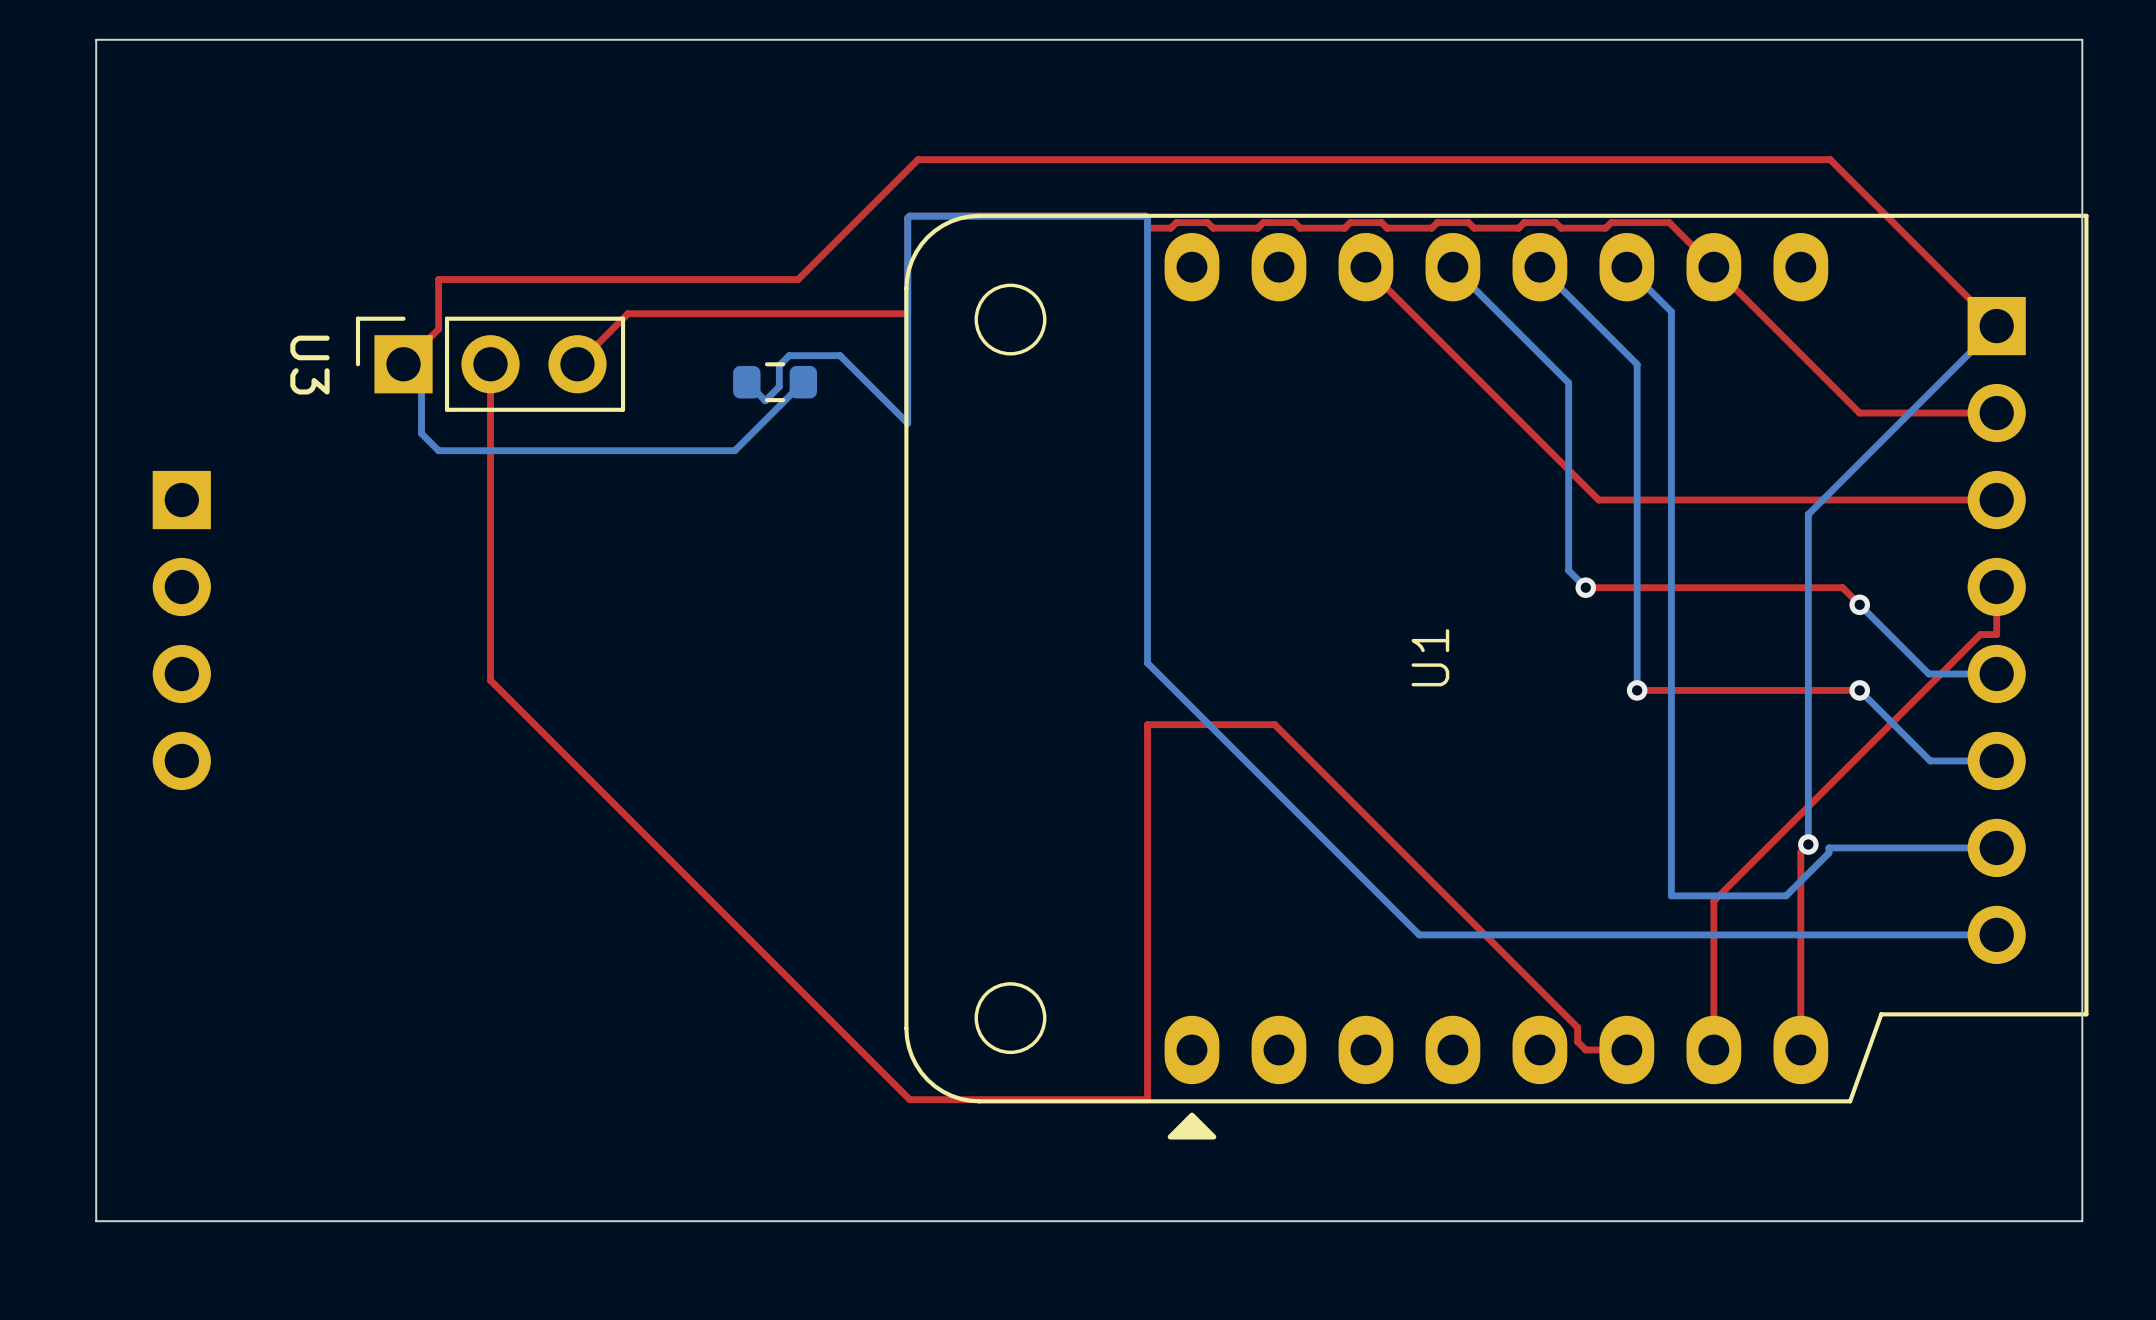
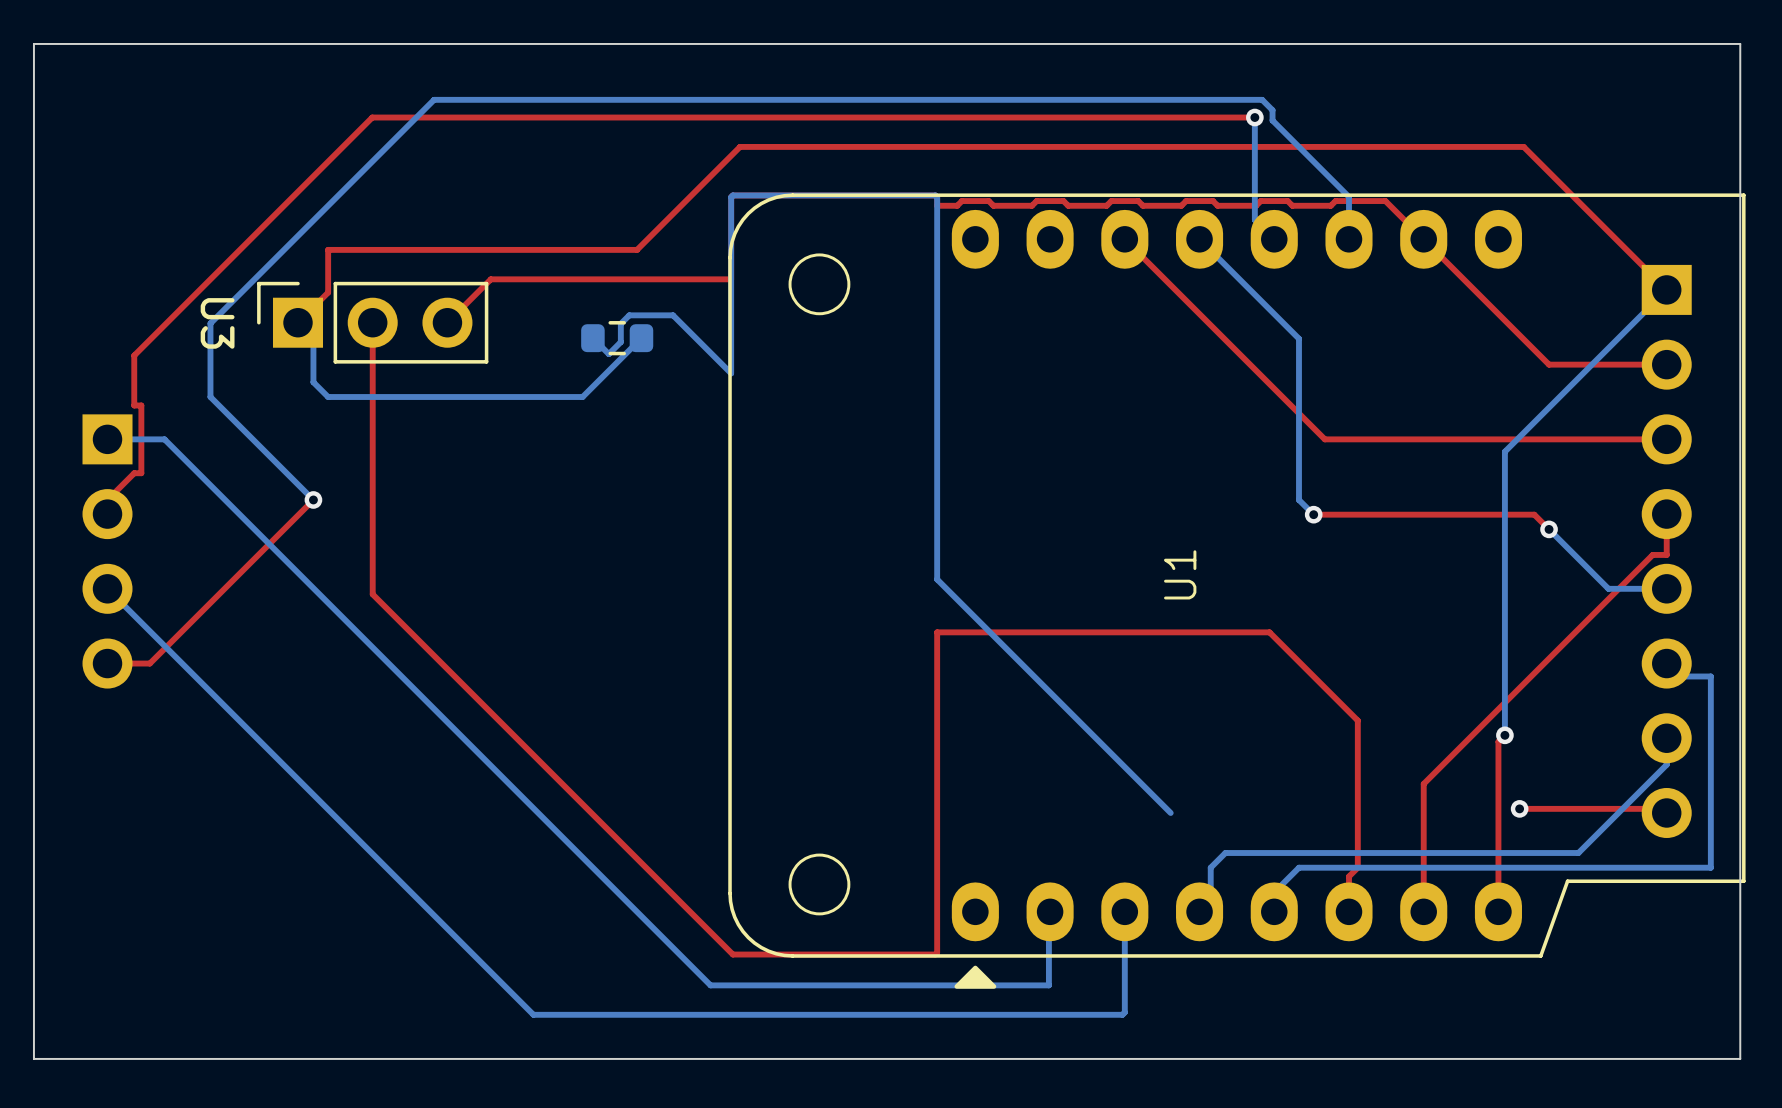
top track: none -> (1254, 117) (372, 117) (134, 355) (134, 405) (141, 405) (141, 473) (134, 473) (107, 499) (107, 514)
via: none -> (1254, 117)
bottom track: (1539, 267) (1637, 364) (1637, 690) -> (1274, 239) (1254, 219) (1254, 117)
bottom track: (1626, 267) (1671, 311) (1671, 895) (1786, 895) (1828, 853) (1828, 847) (1996, 847) -> (1199, 911) (1210, 900) (1210, 867) (1225, 853) (1578, 853) (1666, 764) (1666, 738)
bottom track: none -> (1349, 239) (1349, 196) (1272, 120) (1272, 110) (1262, 99) (434, 99) (210, 323) (210, 397) (313, 499)
bottom track: none -> (107, 439) (164, 439) (710, 985) (1048, 985) (1050, 911)
top track: none -> (313, 499) (149, 663) (107, 663)
via: none -> (313, 499)
bottom track: none -> (107, 588) (533, 1014) (1122, 1014) (1124, 1012) (1124, 911)
via: (1637, 690) -> none
bottom track: (1859, 690) (1930, 760) (1996, 760) -> (1274, 911) (1274, 892) (1298, 867) (1710, 867) (1710, 676) (1679, 676) (1666, 663)
top track: (1859, 690) (1637, 690) -> none
via: (1859, 690) -> none
top track: (1274, 724) (1577, 1027) (1577, 1041) (1585, 1049) (1626, 1049) -> (1046, 632) (1269, 632) (1357, 720) (1357, 867) (1349, 876) (1349, 911)
top track: none -> (1519, 808) (1662, 808) (1666, 812)
via: none -> (1519, 808)
bottom track: (1996, 934) (1419, 934) -> none

